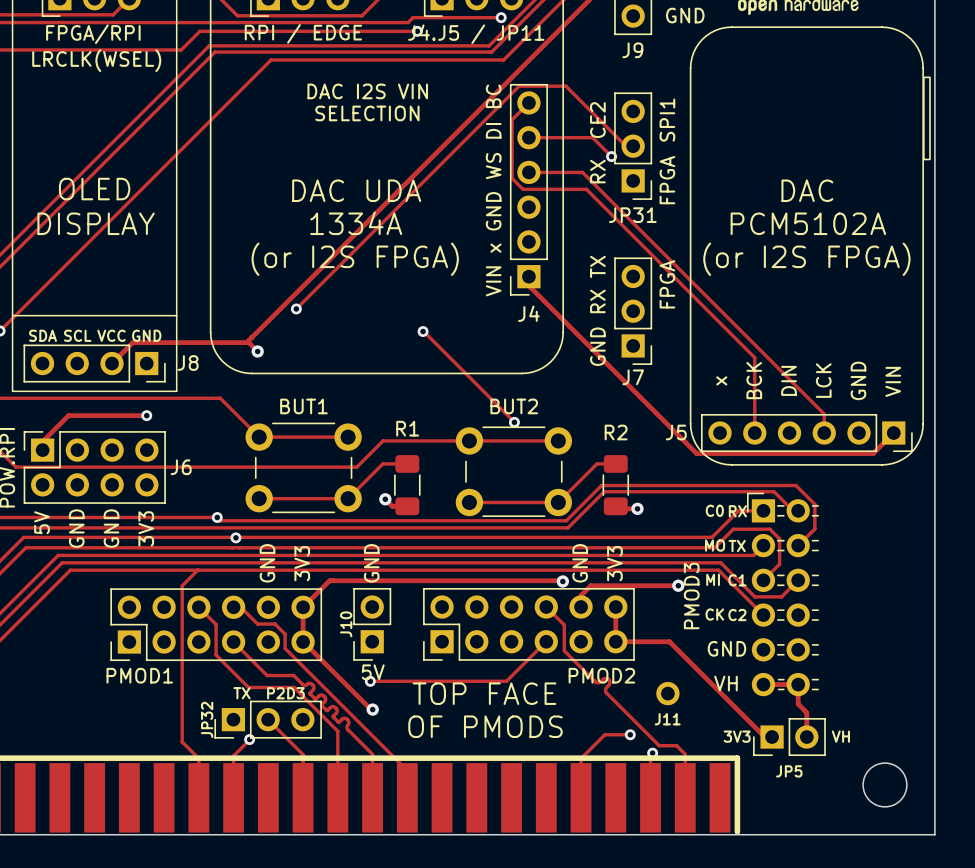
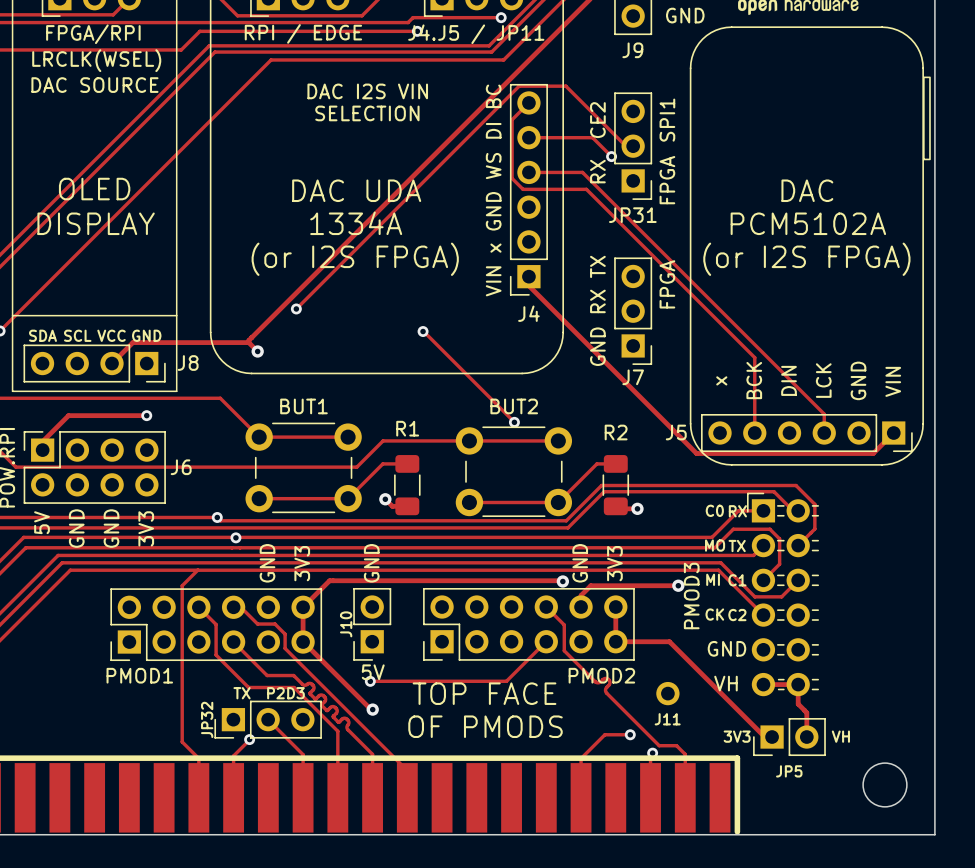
text: none -> DAC SOURCE (94, 85)

